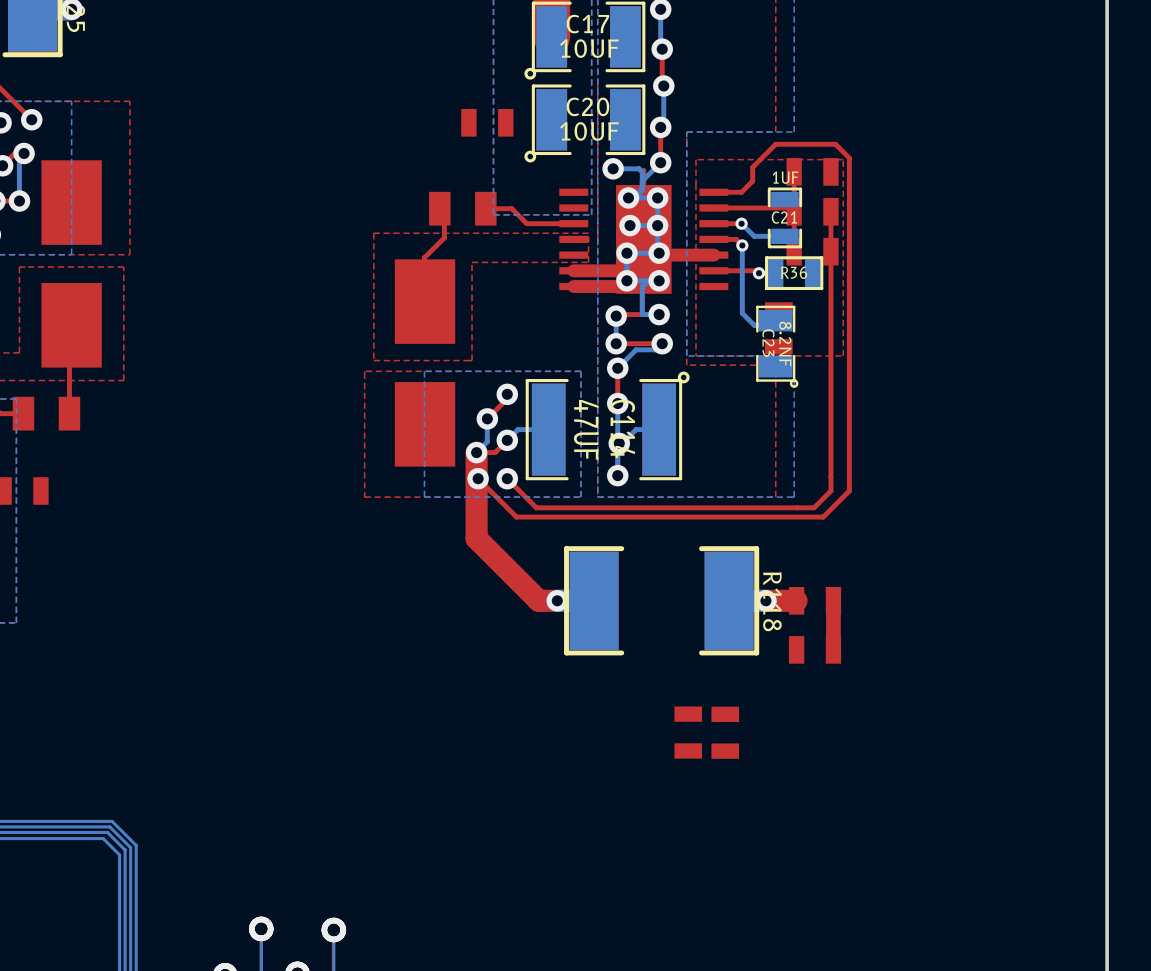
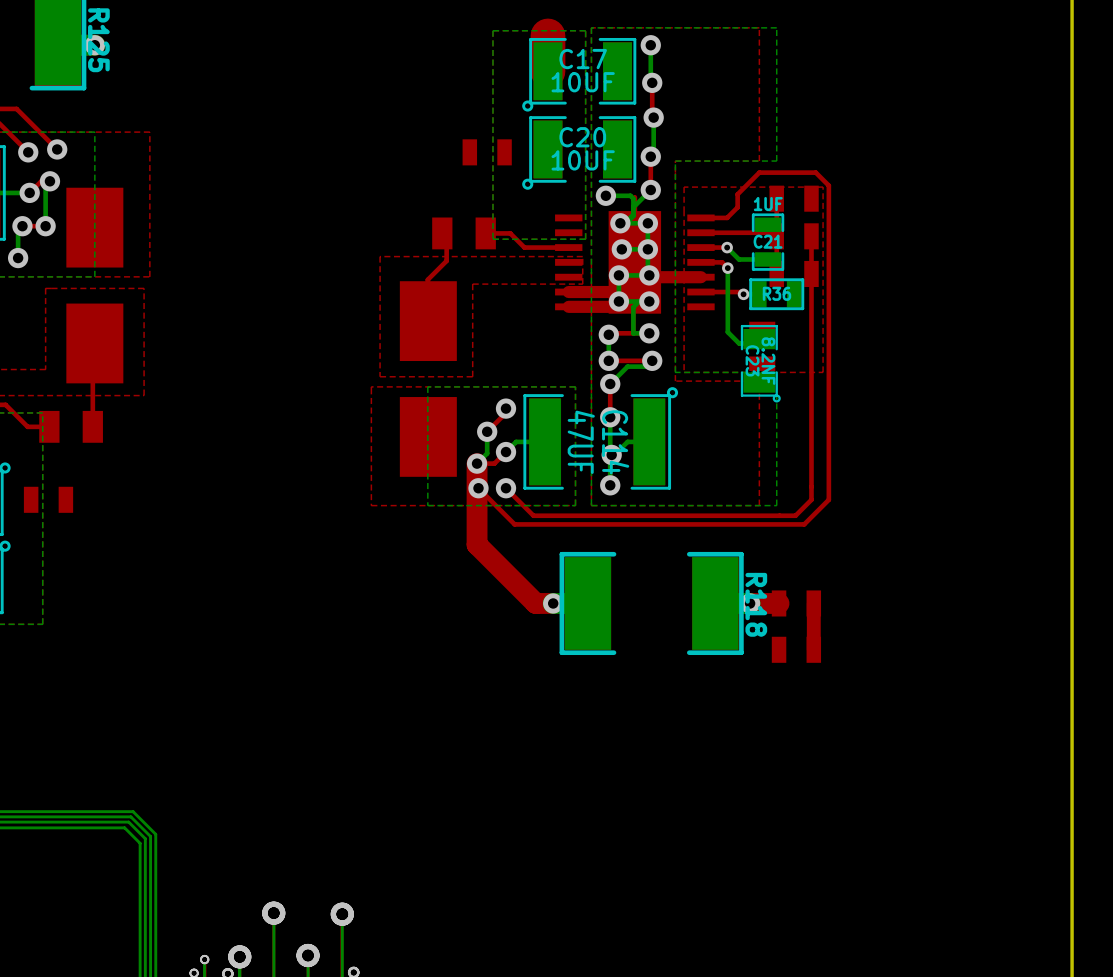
part: (688, 732) -> none
part: (725, 732) -> none

